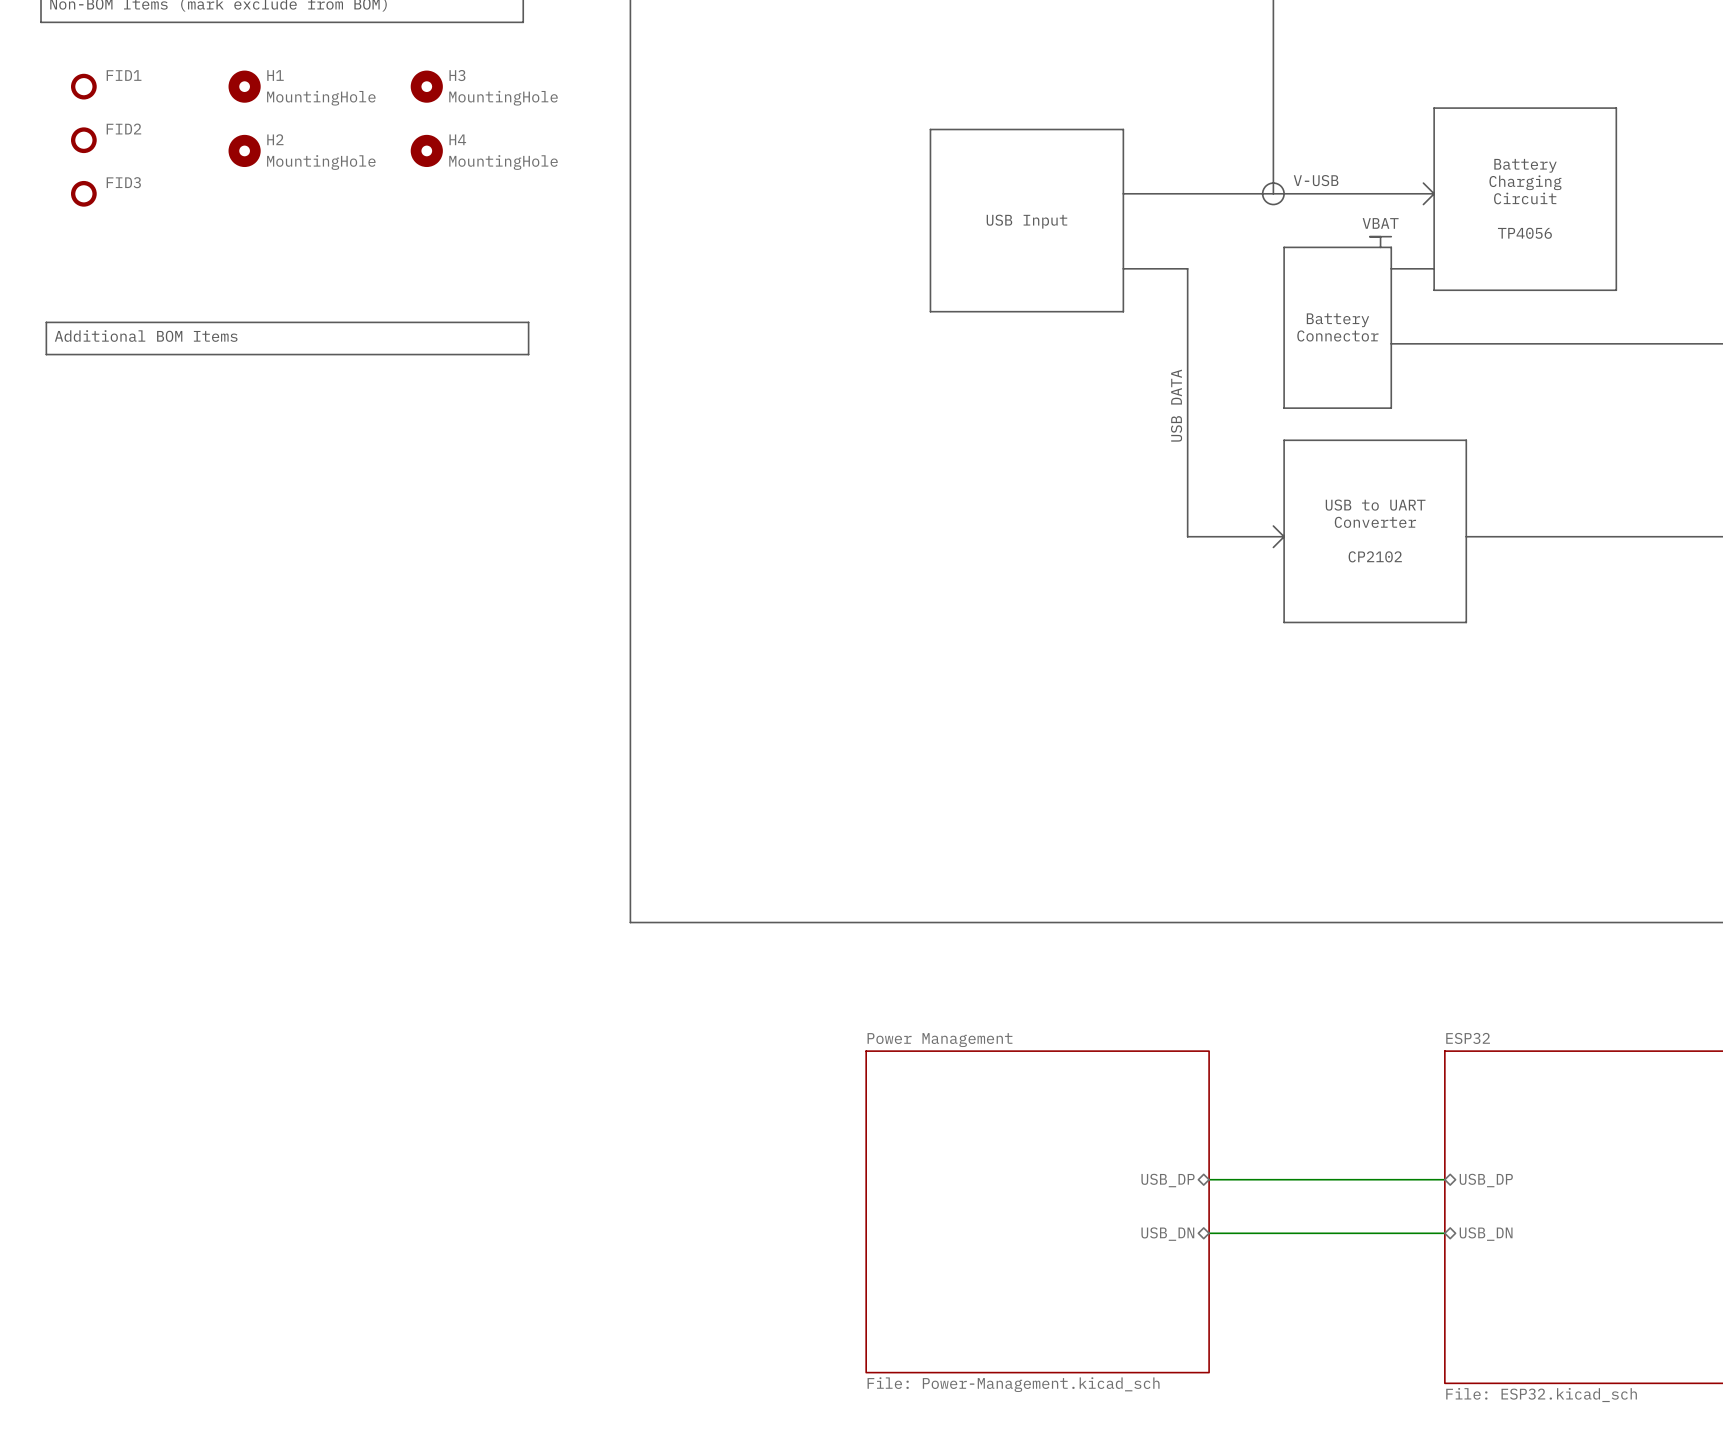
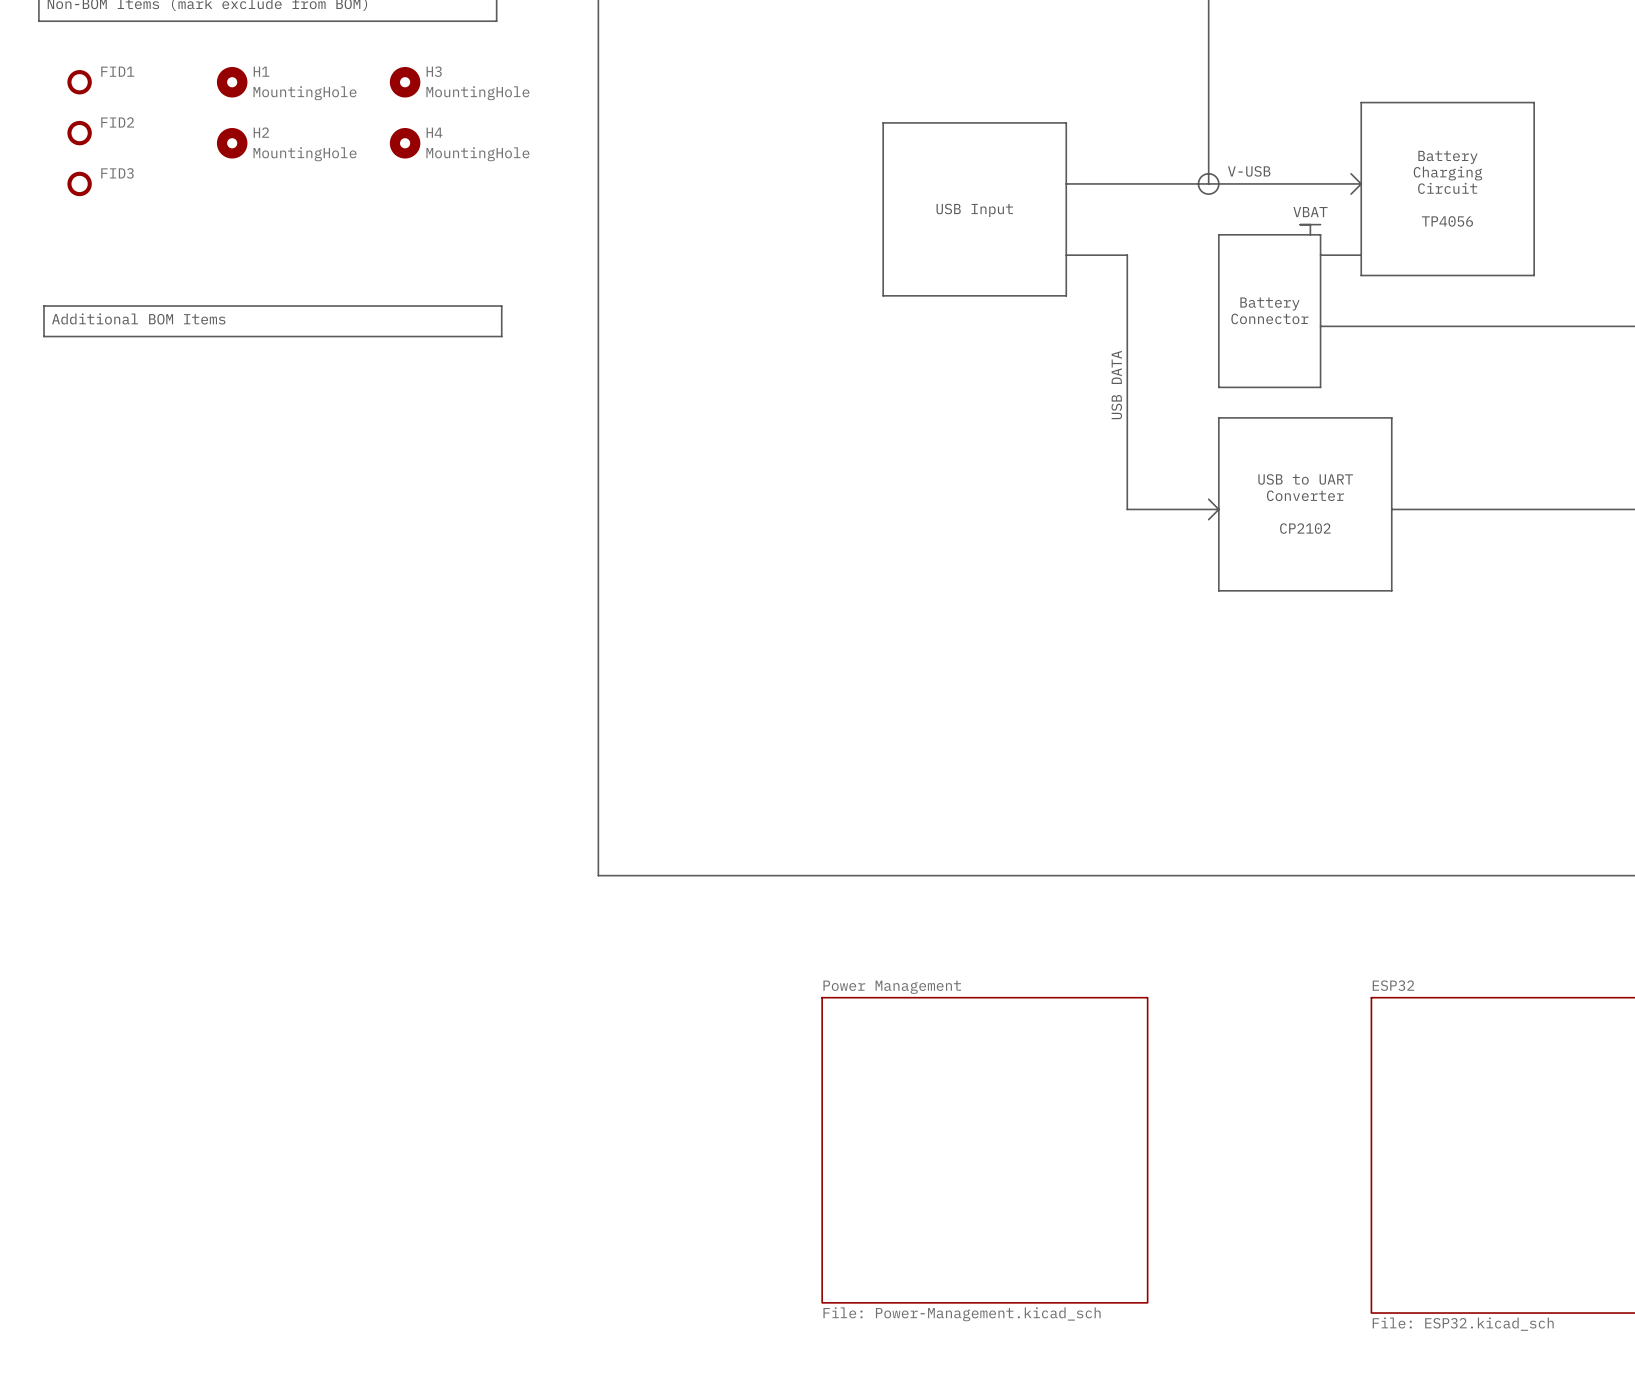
wire: (1209, 1179) (1444, 1179) -> none
sheet pin: USB_DP (1168, 1180) -> none
sheet pin: USB_DP (1486, 1180) -> none
wire: (1209, 1233) (1444, 1233) -> none
sheet pin: USB_DN (1167, 1234) -> none
sheet pin: USB_DN (1486, 1234) -> none

